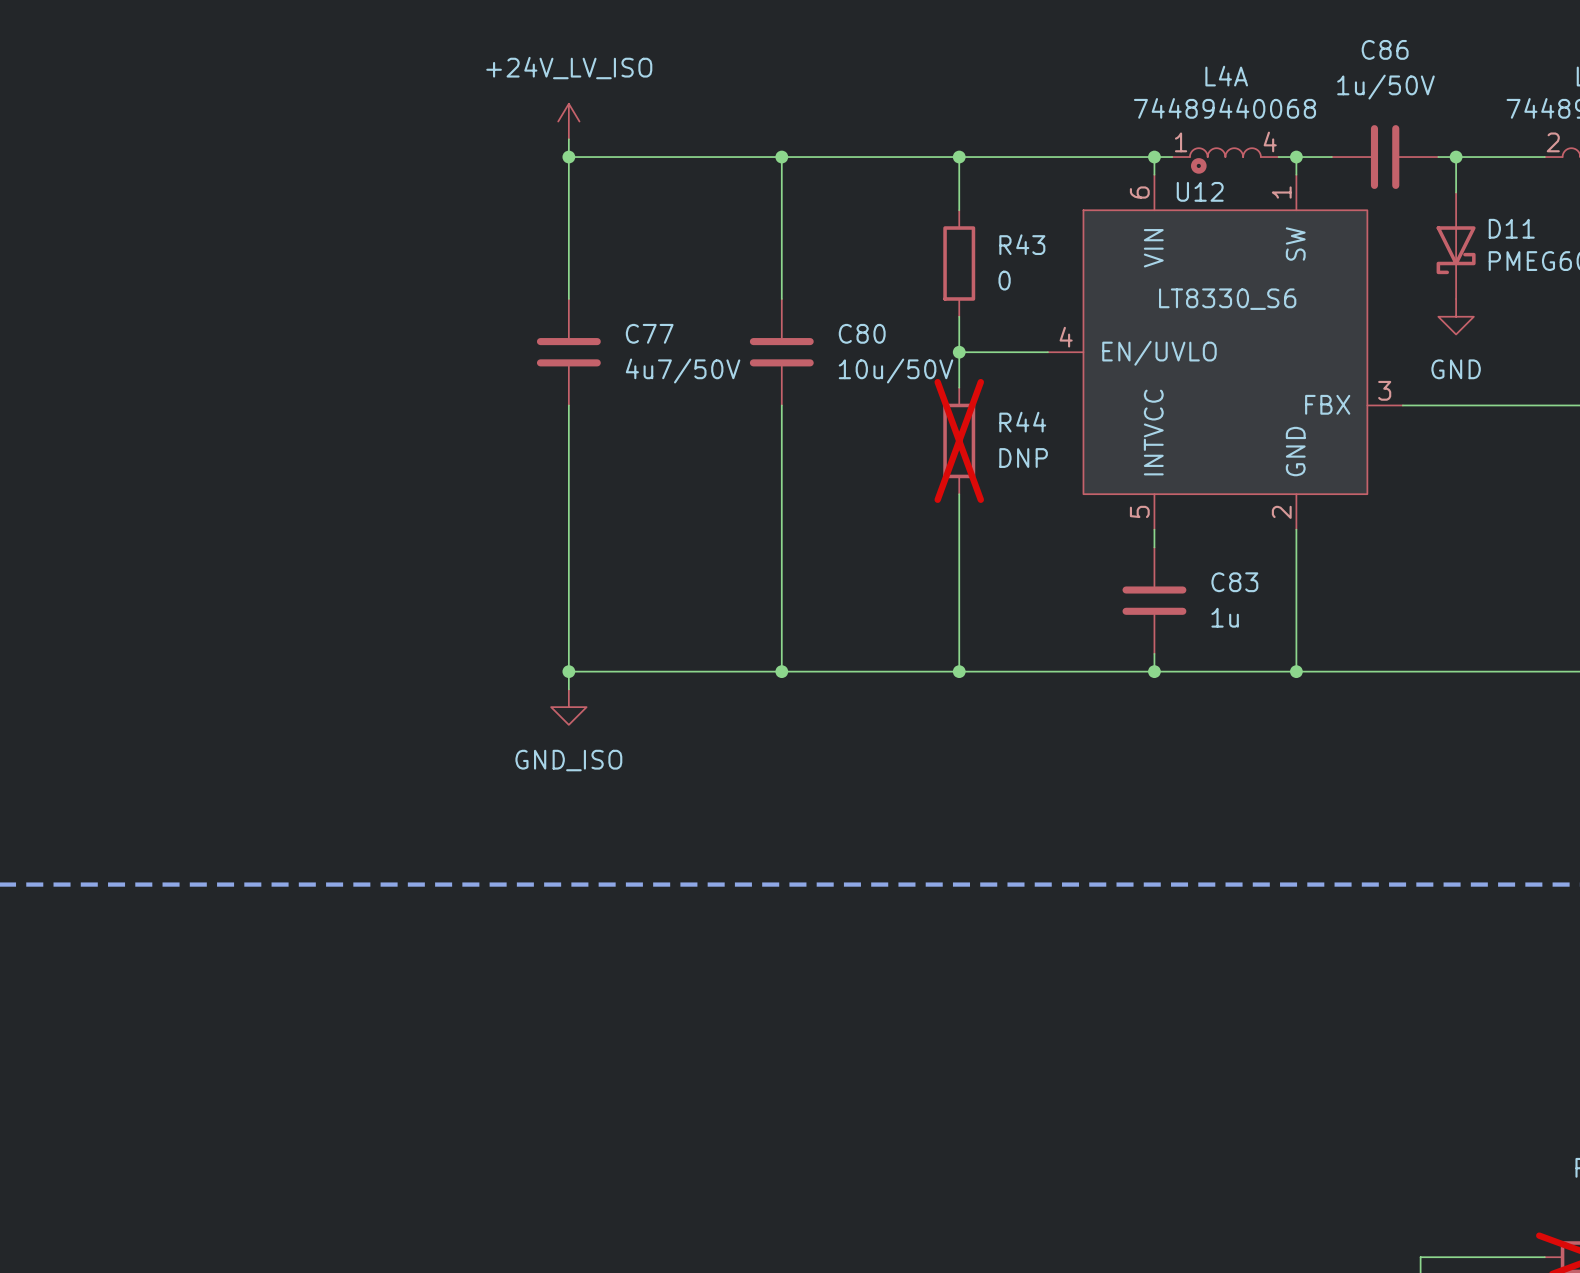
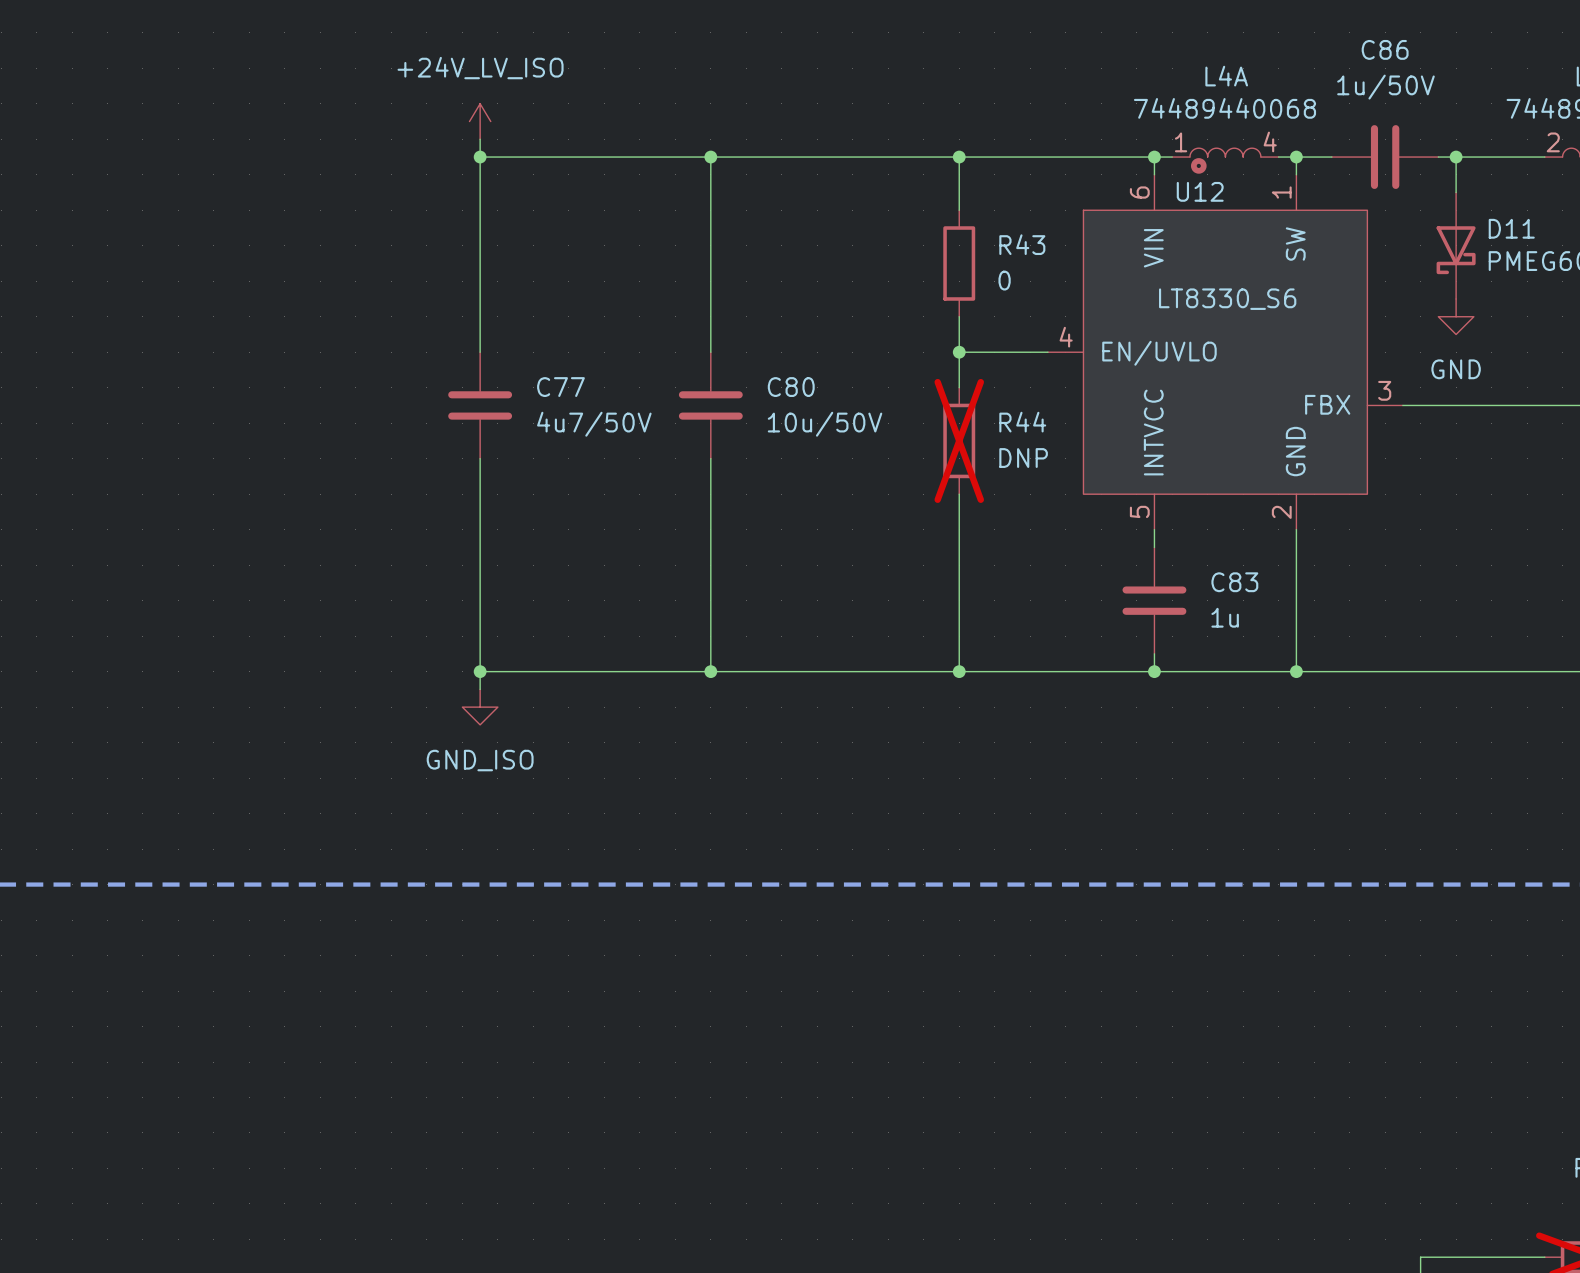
power symbol position: +24V_LV_ISO (568, 121) -> +24V_LV_ISO (480, 121)
wire: none -> (480, 139) (480, 352)
wire: (568, 139) (568, 298) -> none
wire: none -> (480, 157) (568, 157)
junction: none -> (480, 157)
junction: (568, 157) -> none
wire: none -> (710, 157) (710, 352)
junction: none -> (710, 157)
wire: (781, 157) (781, 298) -> none
junction: (781, 157) -> none
C77 position: (568, 352) -> (480, 405)
C80 position: (781, 352) -> (710, 405)
wire: (568, 405) (568, 689) -> none
wire: (781, 405) (781, 671) -> none
wire: none -> (480, 458) (480, 689)
wire: none -> (710, 458) (710, 671)
wire: none -> (480, 671) (568, 671)
junction: none -> (480, 671)
junction: (568, 671) -> none
junction: none -> (710, 671)
junction: (781, 671) -> none
power symbol position: GND_ISO (568, 707) -> GND_ISO (480, 707)

